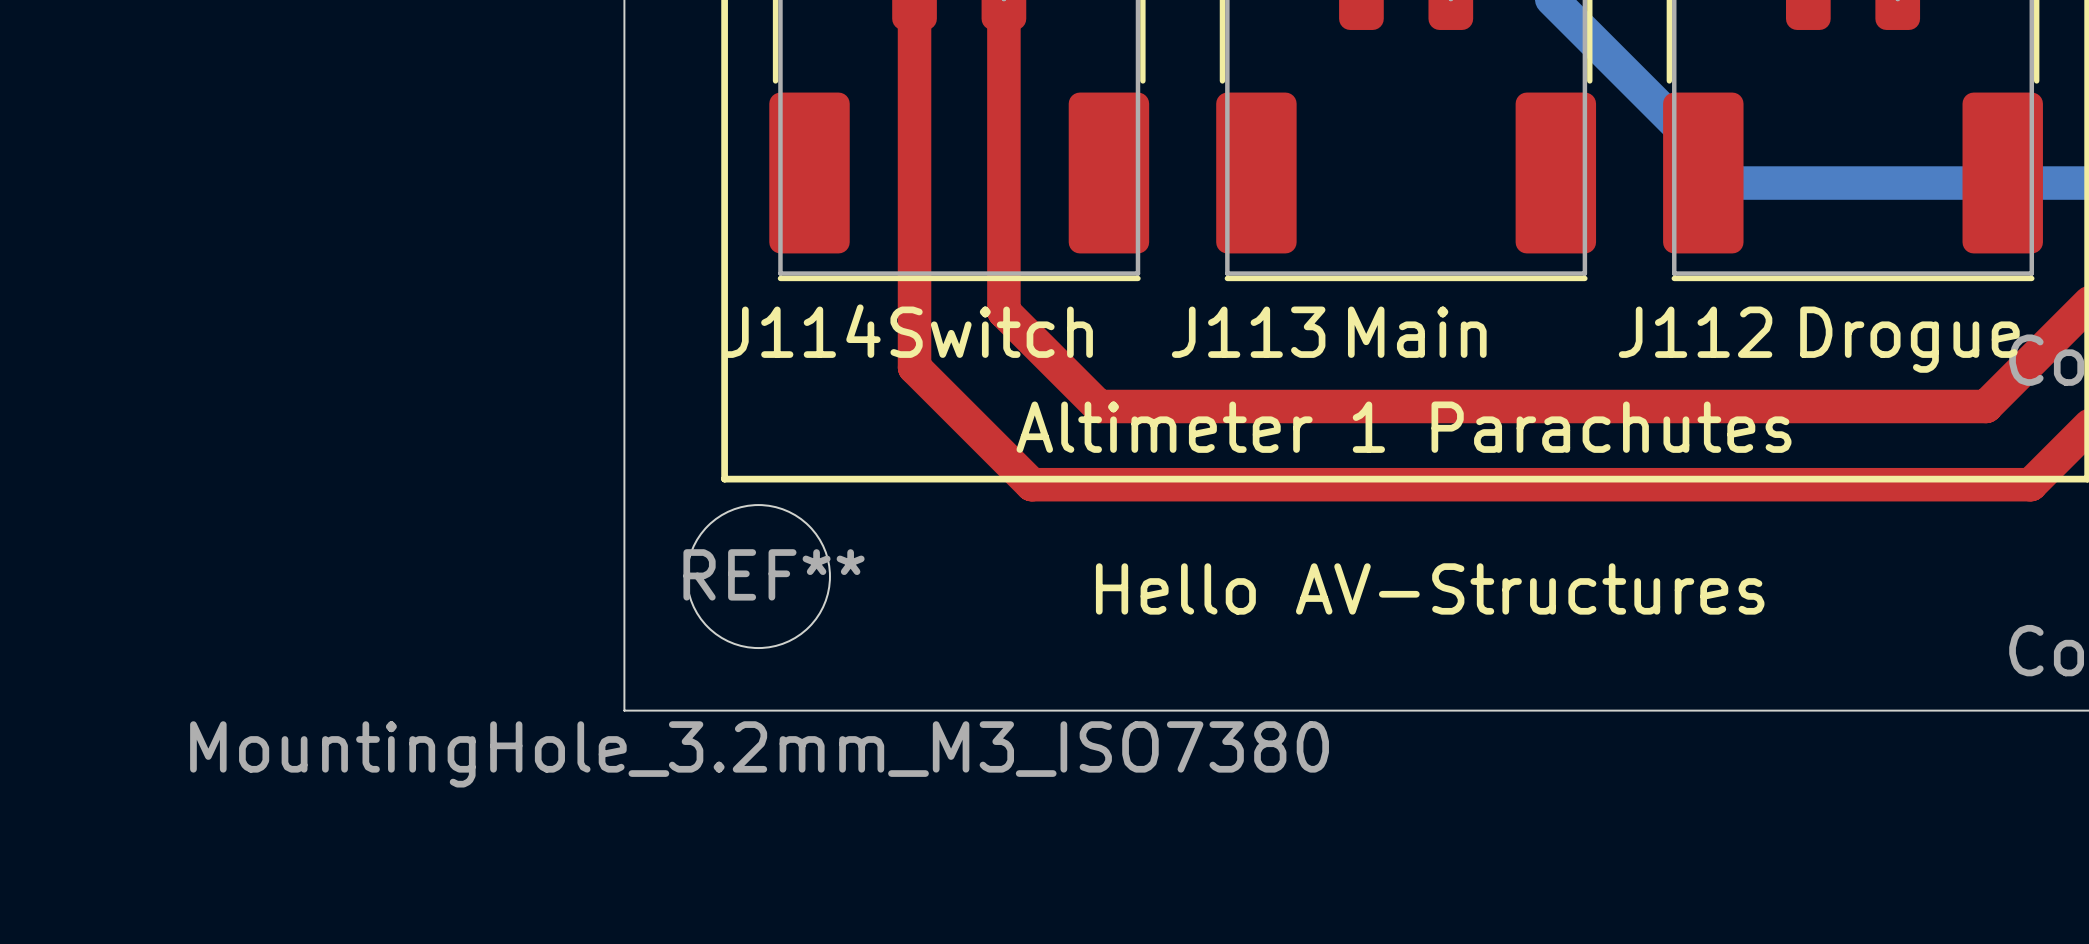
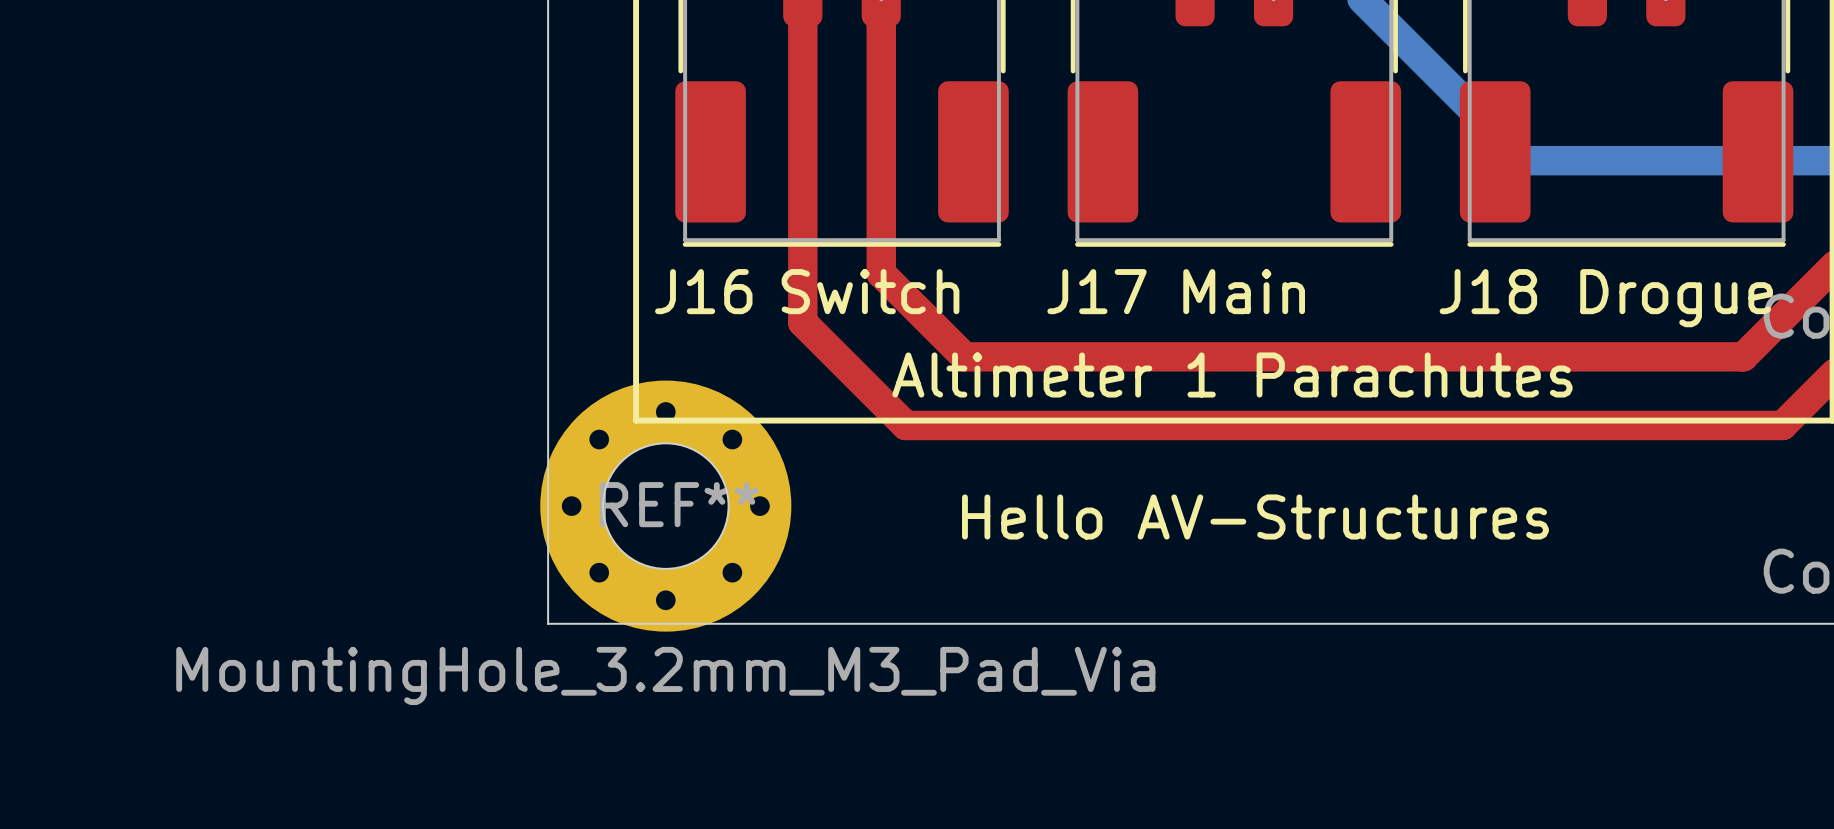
J114 name: J114 (802, 331) -> J16 (703, 291)
J113 name: J113 (1248, 332) -> J17 (1097, 291)
J112 name: J112 (1695, 332) -> J18 (1488, 291)
round board edge: none -> [602, 443, 729, 570]
REF** footprint: [686, 505, 830, 649] -> [540, 380, 792, 632]
REF** value: MountingHole_3.2mm_M3_ISO7380 (759, 754) -> MountingHole_3.2mm_M3_Pad_Via (665, 675)

